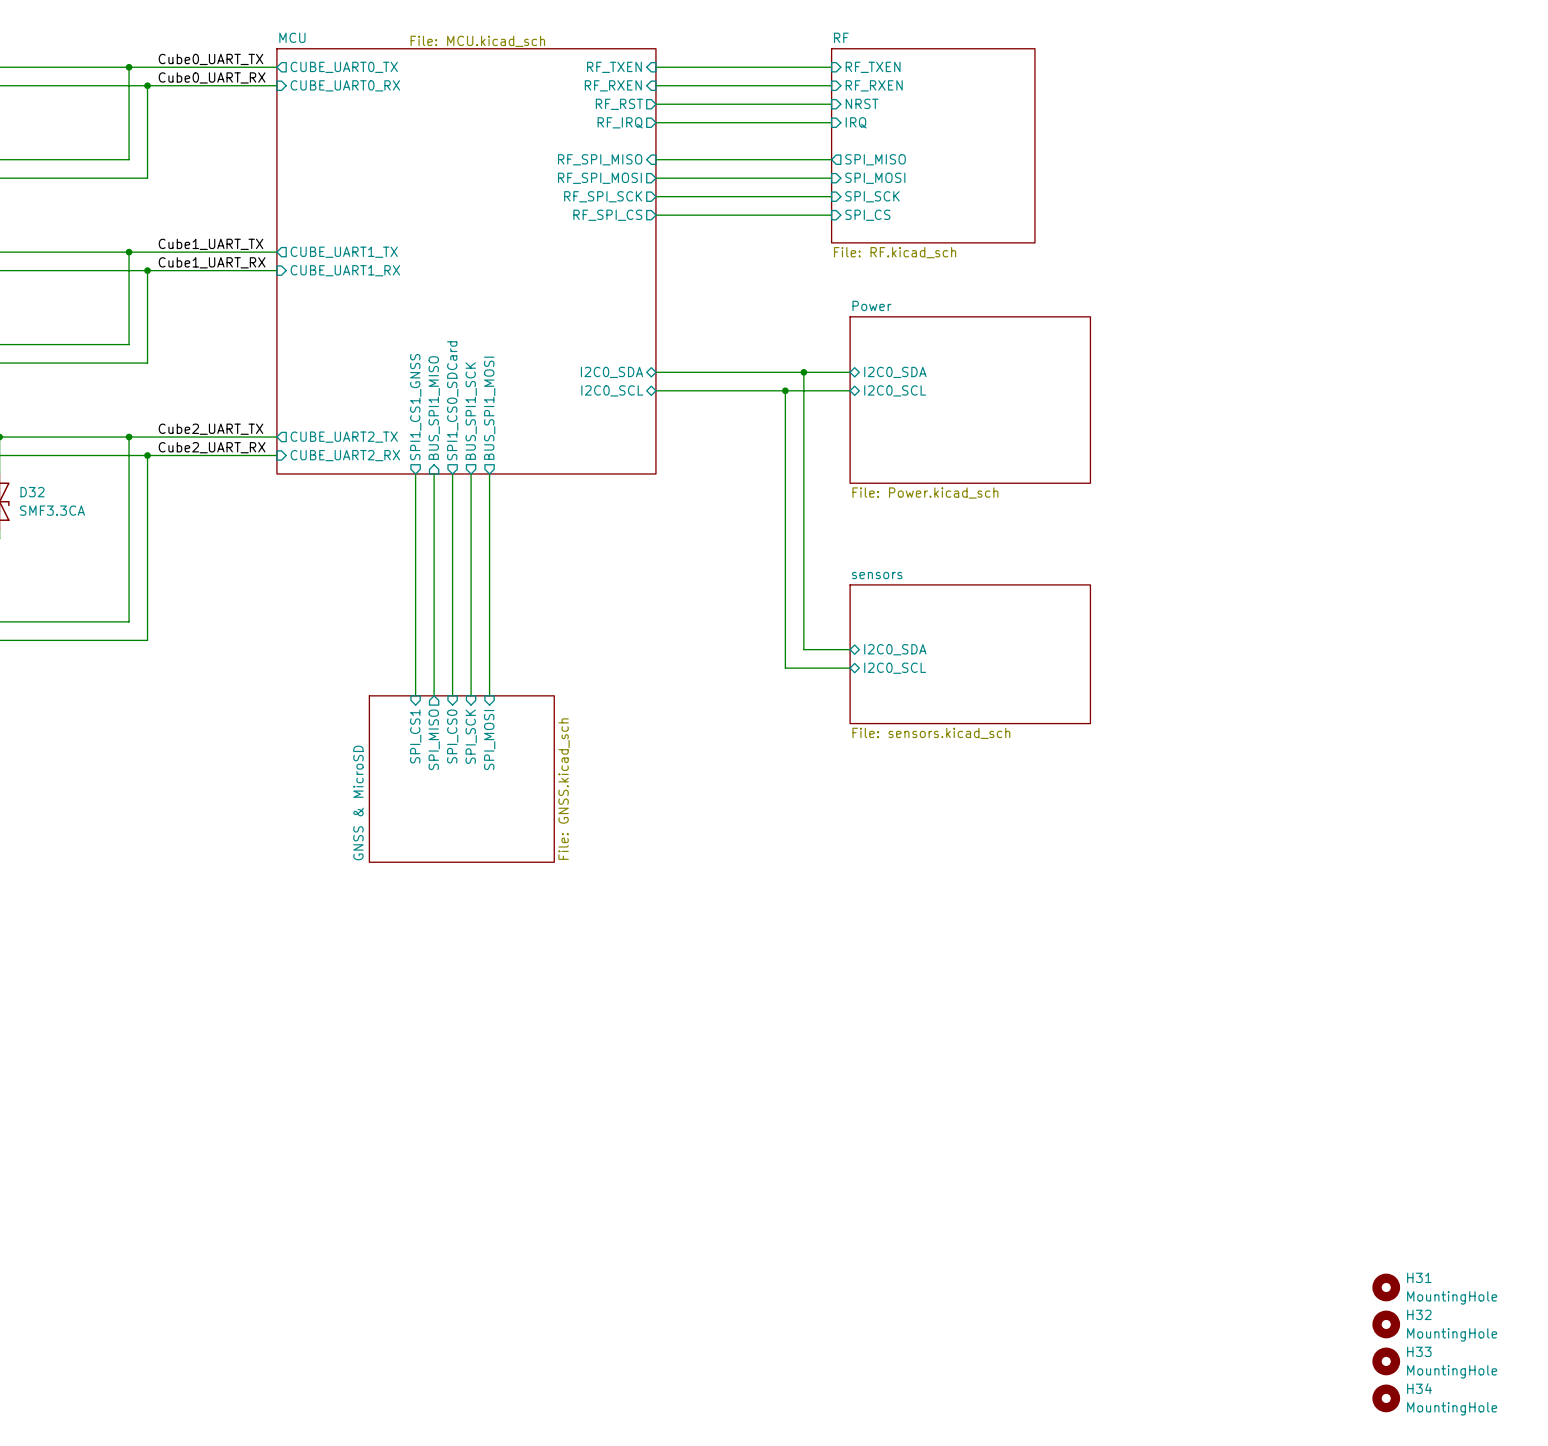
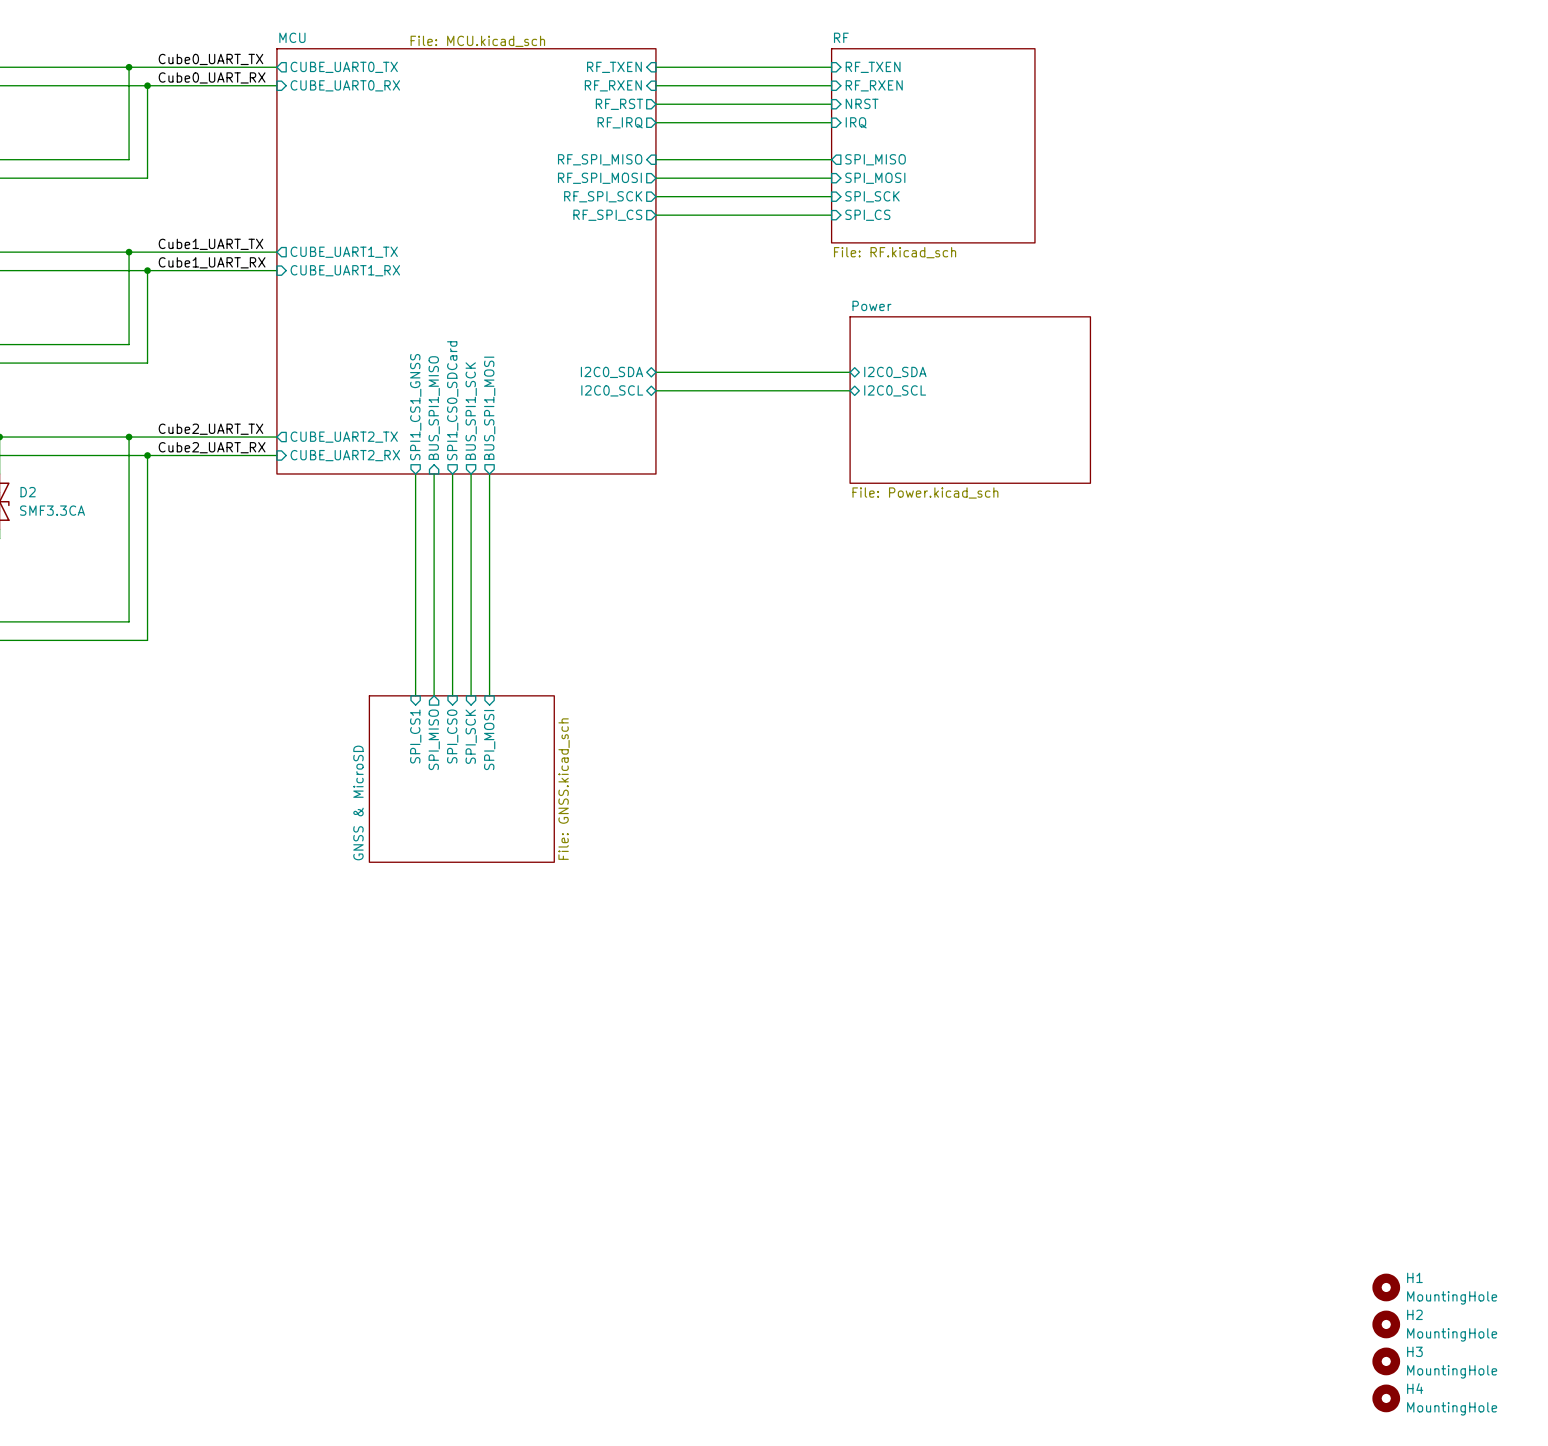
wire: (803, 372) (803, 649) (850, 649) -> none
junction: (803, 372) -> none
wire: (785, 390) (785, 668) (850, 668) -> none
junction: (785, 390) -> none
D32 name: D32 (32, 492) -> D2 (28, 492)
sheet pin: I2C0_SDA (895, 649) -> none
sheet sensors: File: sensors.kicad_sch (970, 654) -> none
sheet pin: I2C0_SCL (895, 668) -> none
H31 name: H31 (1419, 1277) -> H1 (1414, 1277)
H32 name: H32 (1419, 1314) -> H2 (1414, 1314)
H33 name: H33 (1419, 1351) -> H3 (1414, 1351)
H34 name: H34 (1419, 1388) -> H4 (1415, 1388)

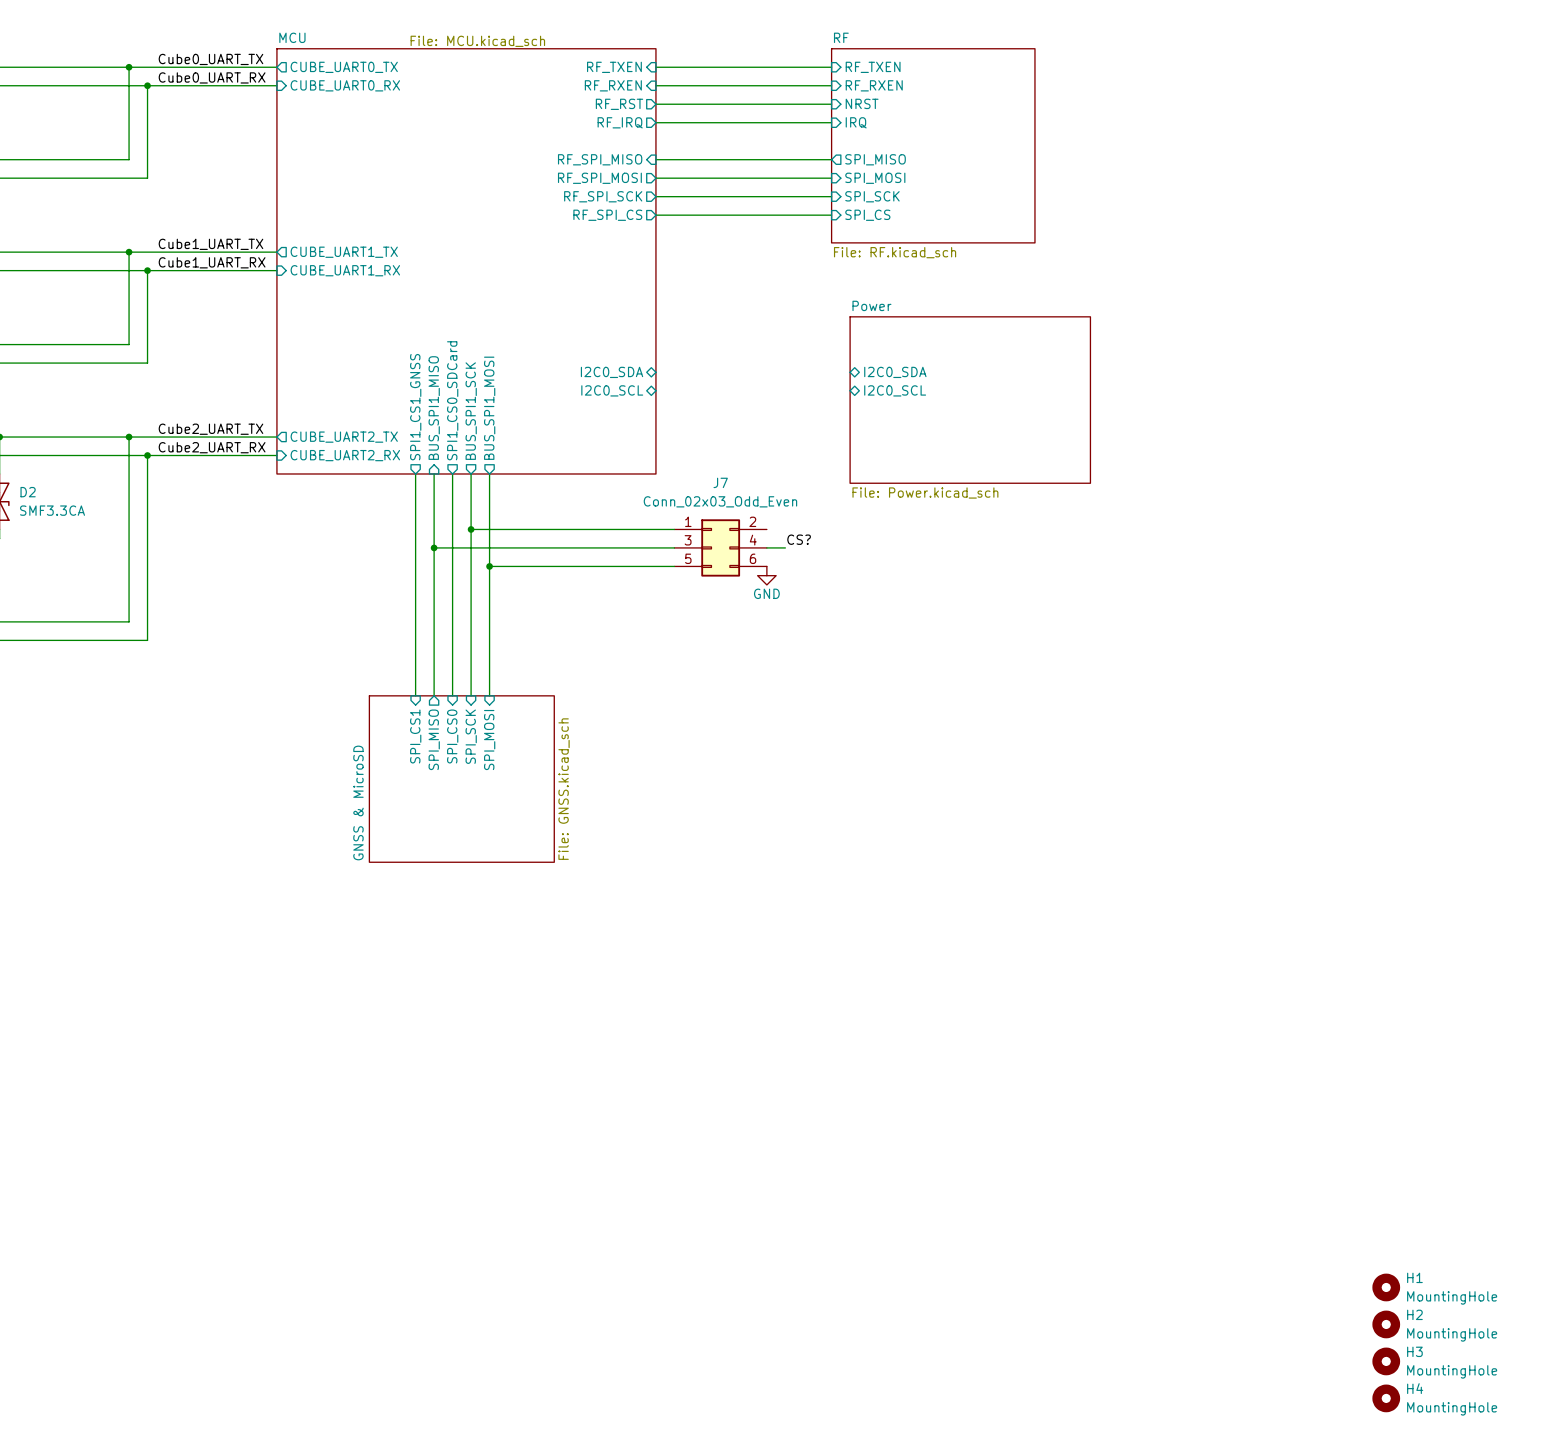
wire: (655, 372) (850, 372) -> none
wire: (655, 390) (850, 390) -> none
wire: none -> (471, 529) (674, 529)
junction: none -> (471, 529)
label: none -> CS? (799, 539)
wire: none -> (434, 547) (674, 547)
junction: none -> (434, 547)
J7: none -> Conn_02x03_Odd_Even (720, 547)
wire: none -> (766, 547) (785, 547)
wire: none -> (489, 566) (674, 566)
junction: none -> (489, 566)
power symbol: none -> GND (766, 575)

